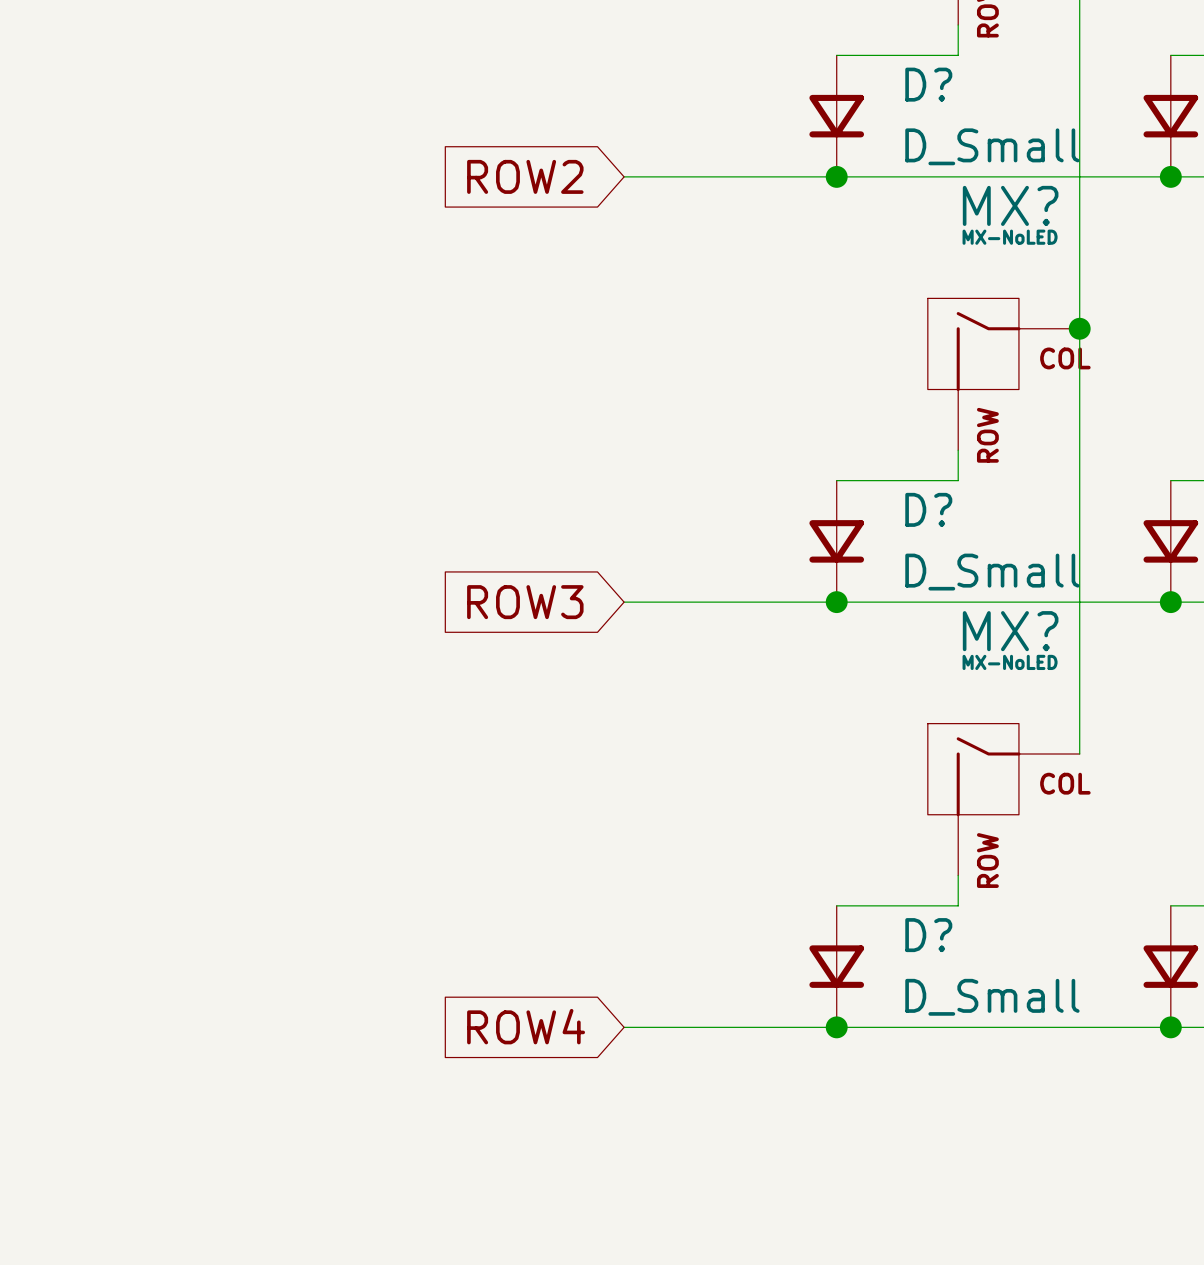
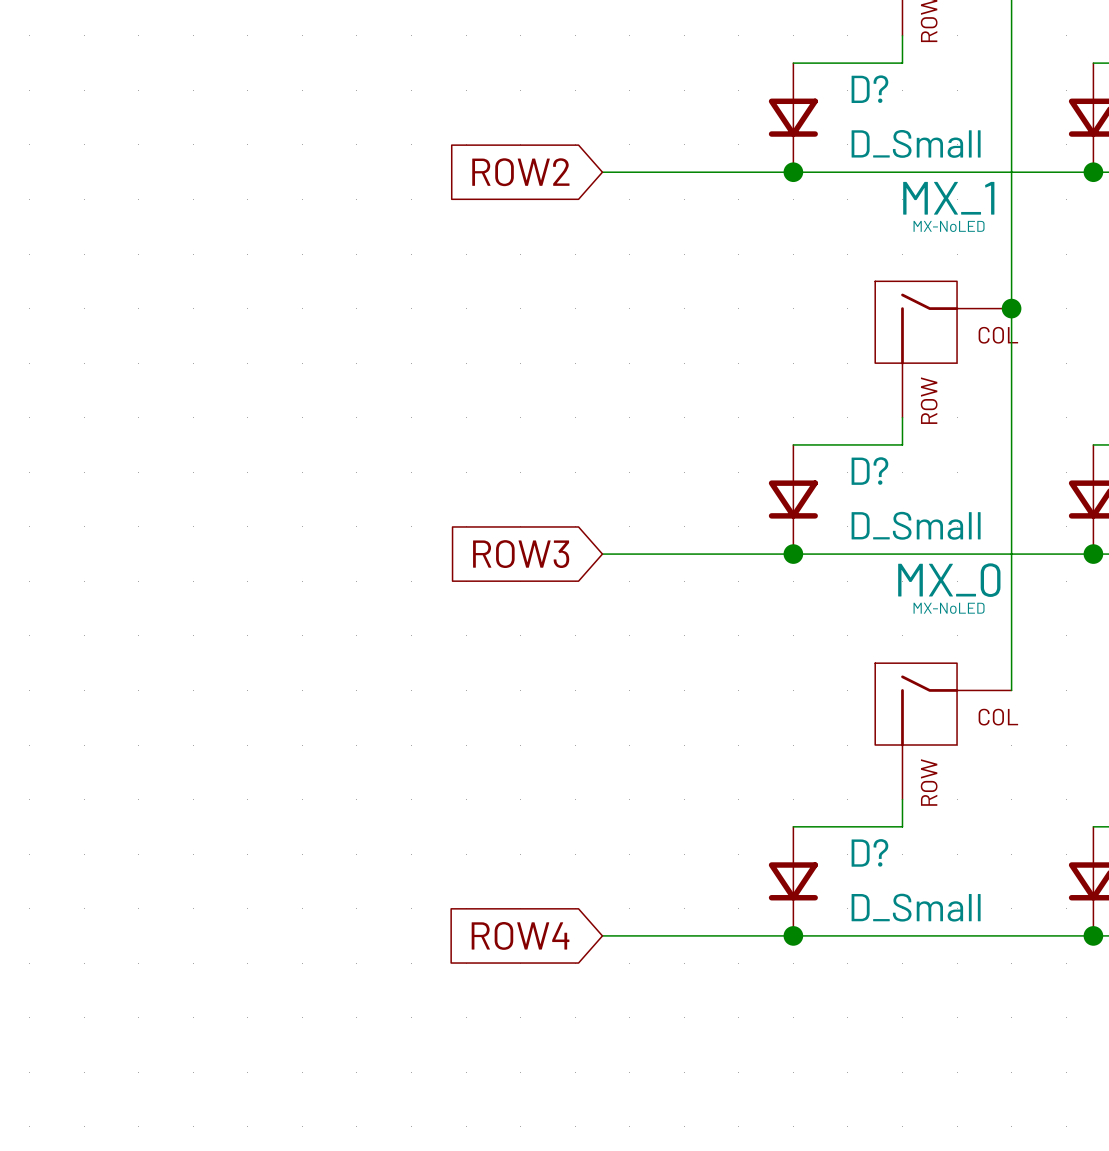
MX? name: MX? (1010, 205) -> MX_1 (948, 198)
MX? name: MX? (1010, 631) -> MX_0 (949, 580)

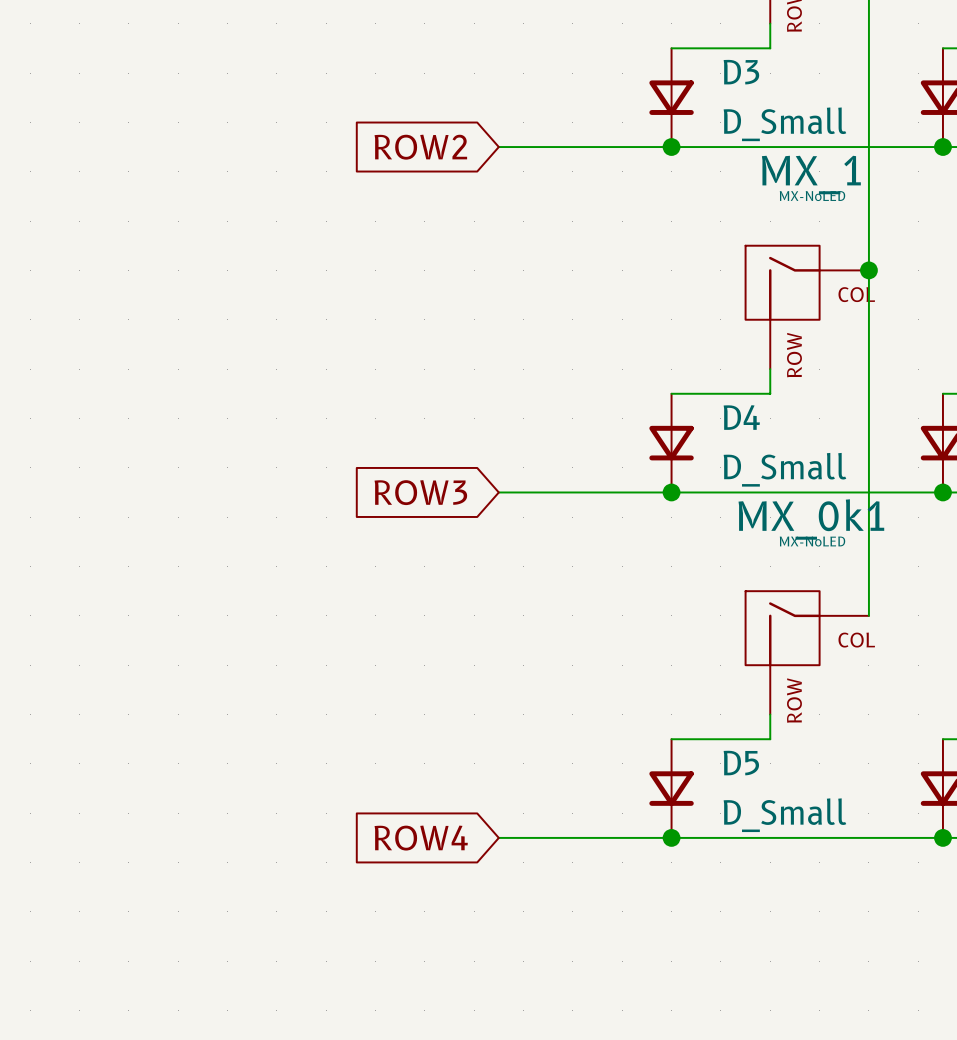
D? name: D? (869, 89) -> D3 (741, 72)
D? name: D? (869, 471) -> D4 (741, 417)
MX_0 name: MX_0 (949, 580) -> MX_0k1 (811, 519)
D? name: D? (869, 852) -> D5 (741, 763)

